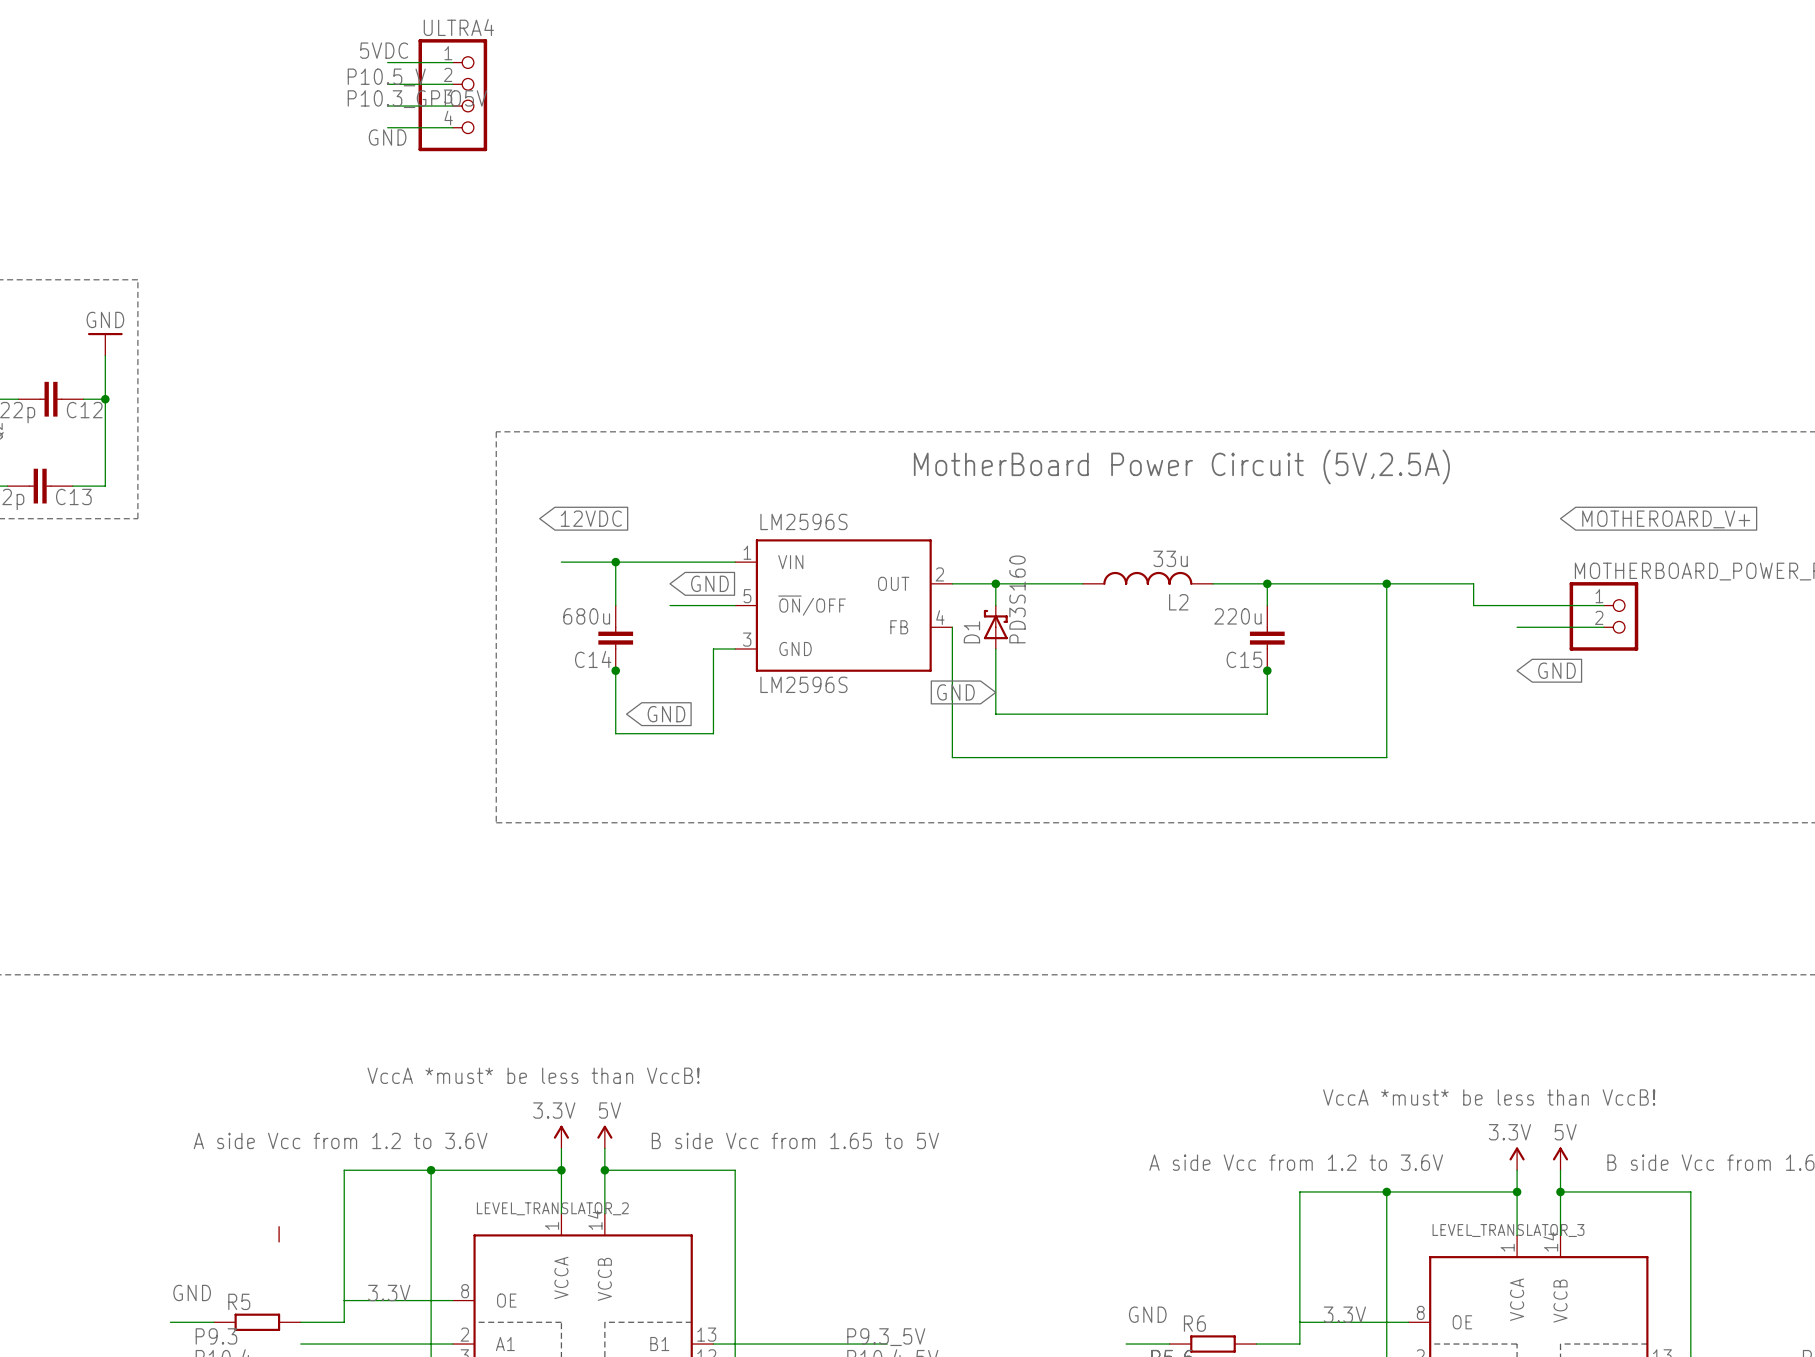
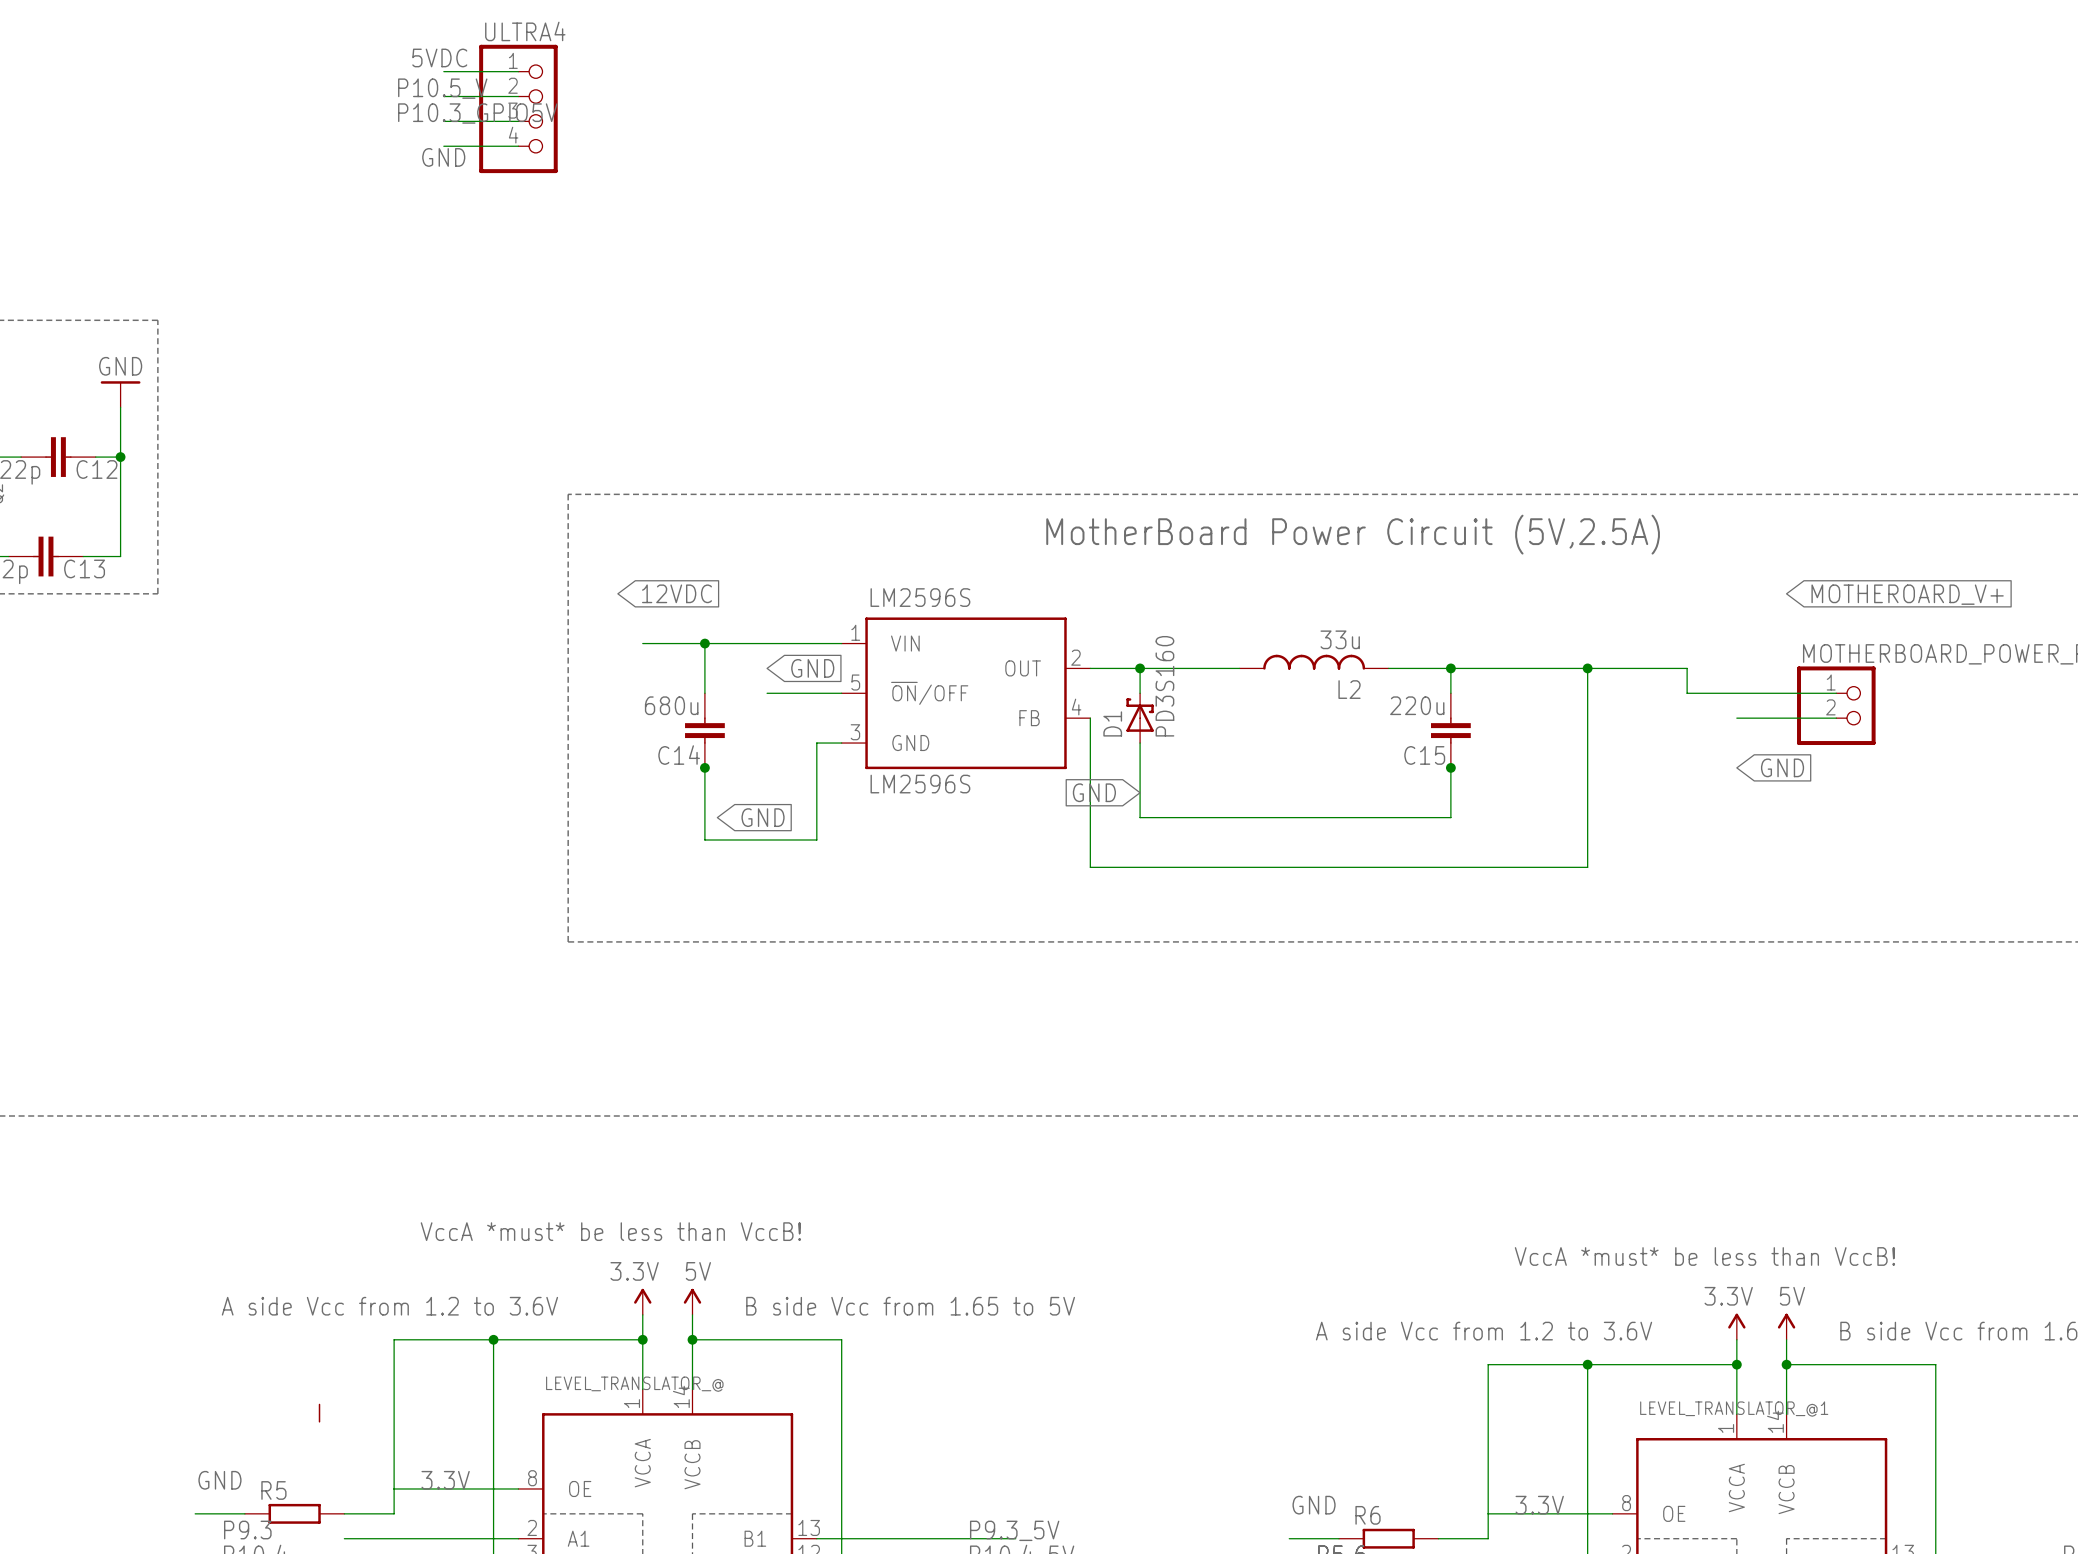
LEVEL_TRANSLATOR_2 name: LEVEL_TRANSLATOR_2 (552, 1208) -> LEVEL_TRANSLATOR_@ (634, 1384)
LEVEL_TRANSLATOR_3 name: LEVEL_TRANSLATOR_3 (1508, 1230) -> LEVEL_TRANSLATOR_@1 (1734, 1409)

